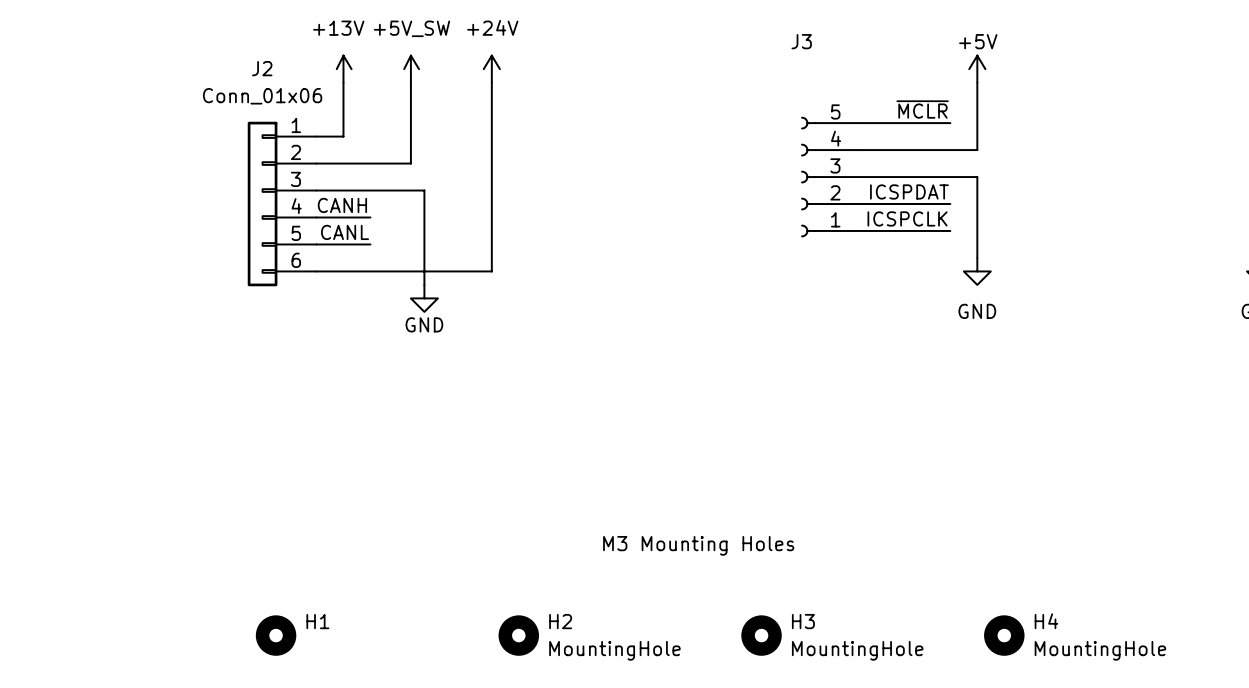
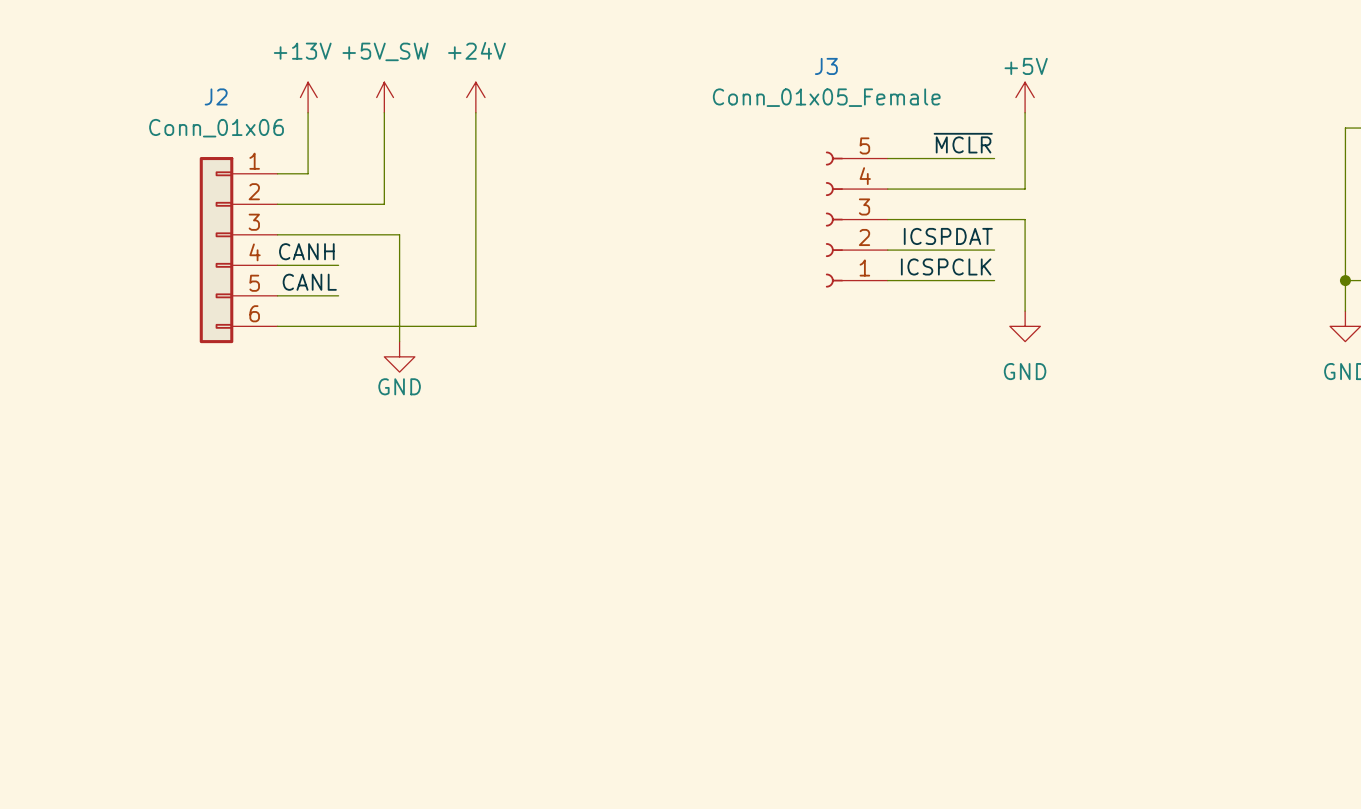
J3 value: none -> Conn_01x05_Female (826, 97)
text: M3 Mounting Holes (698, 545) -> none
H1: (276, 635) -> none
H2: MountingHole (518, 635) -> none
H3: MountingHole (761, 635) -> none
H4: MountingHole (1004, 635) -> none

